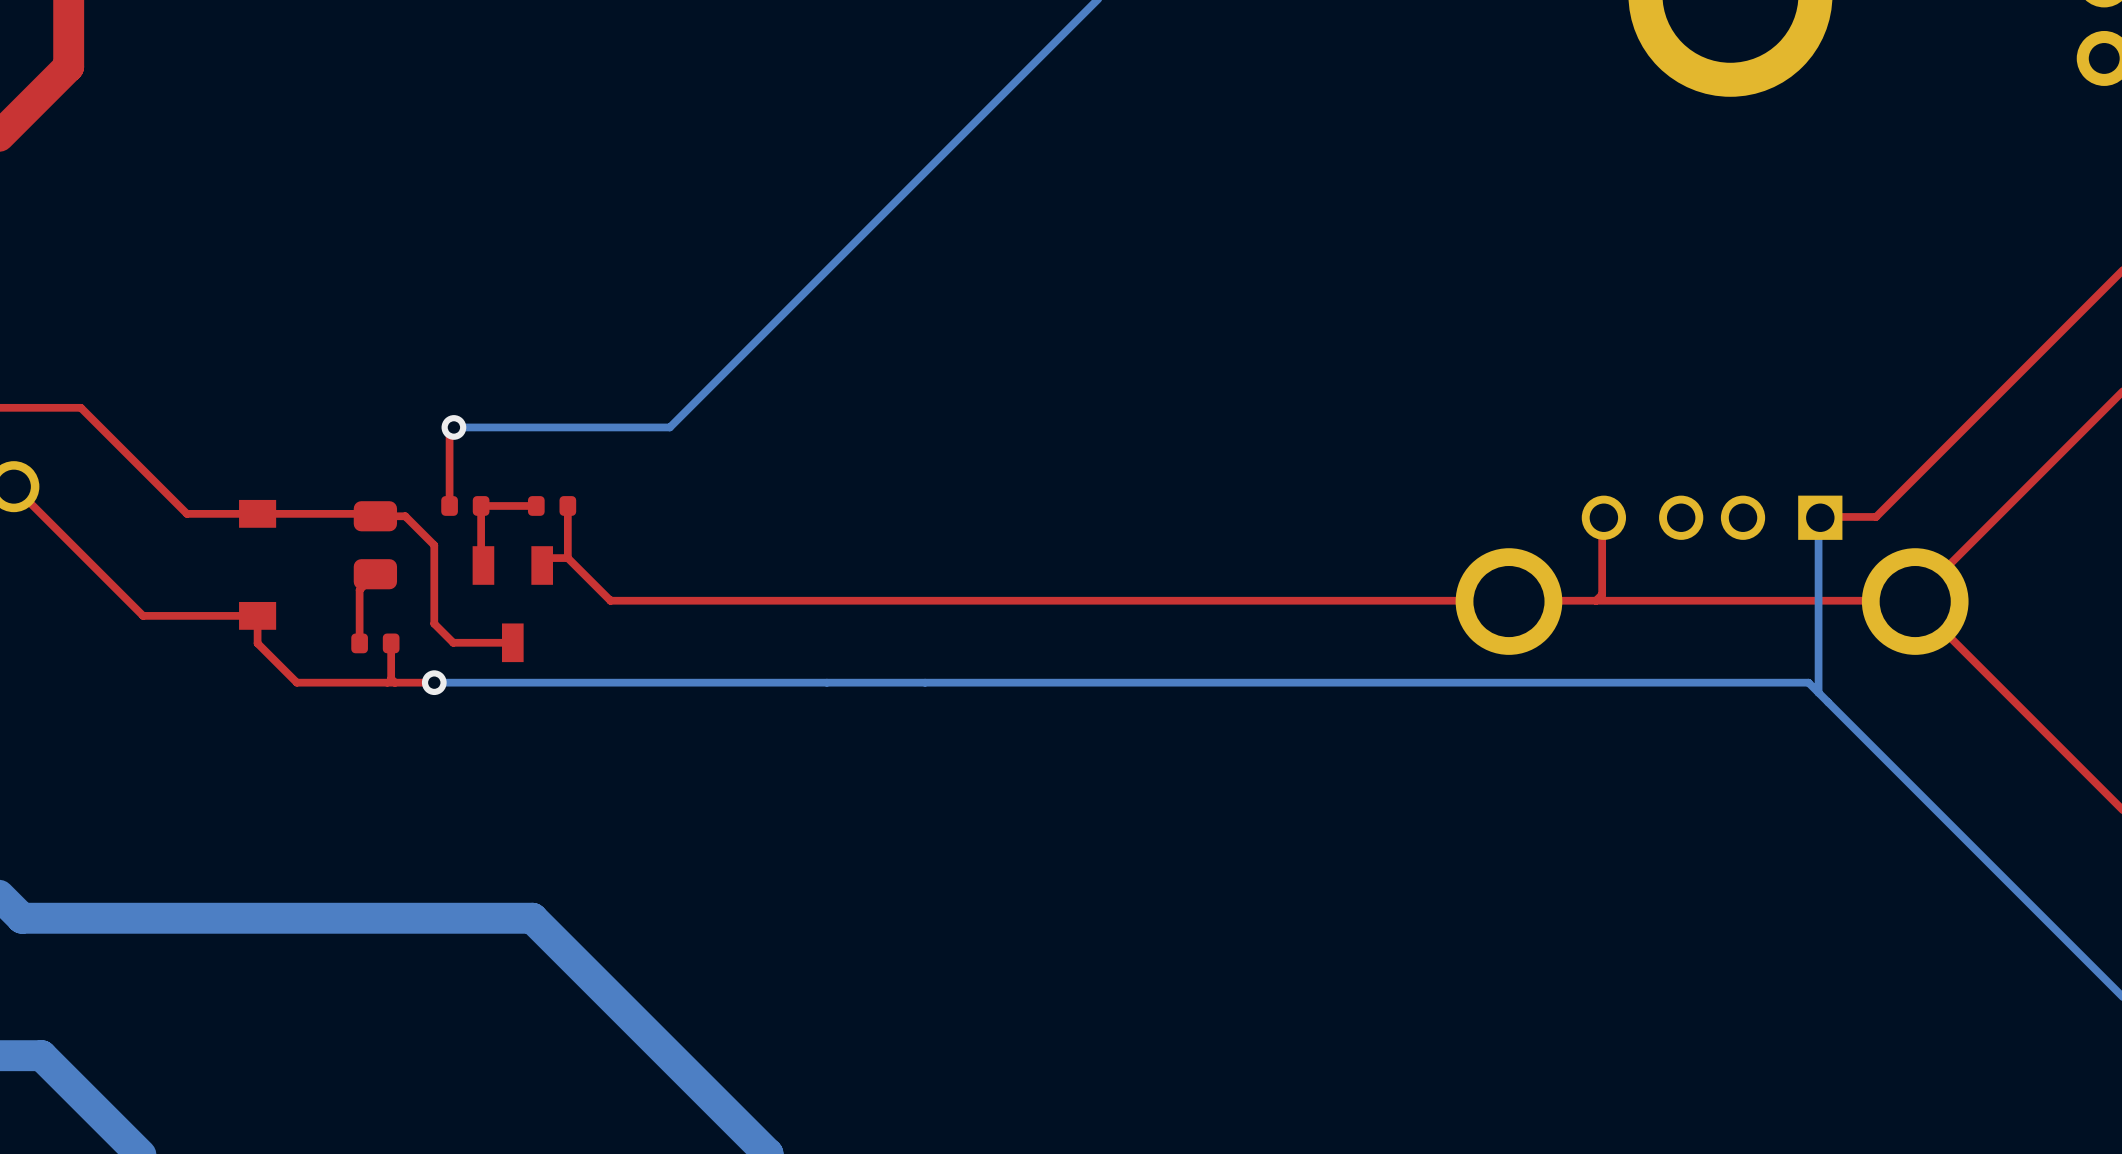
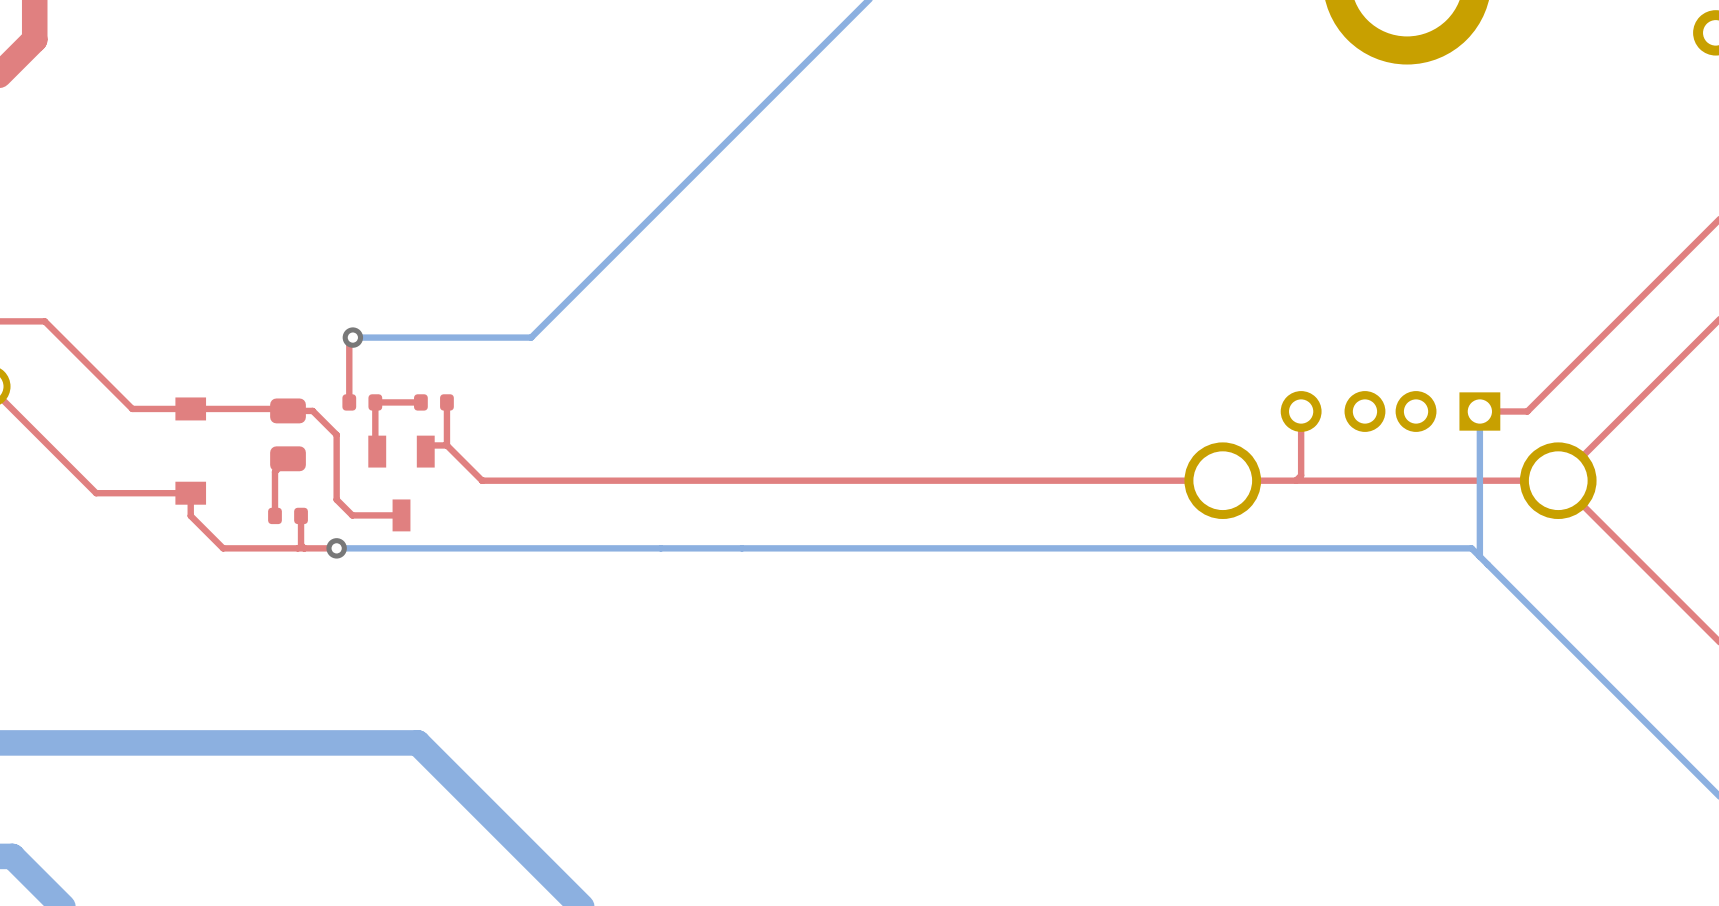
part footprint: [1455, 495, 1969, 655] -> [1184, 391, 1597, 519]

